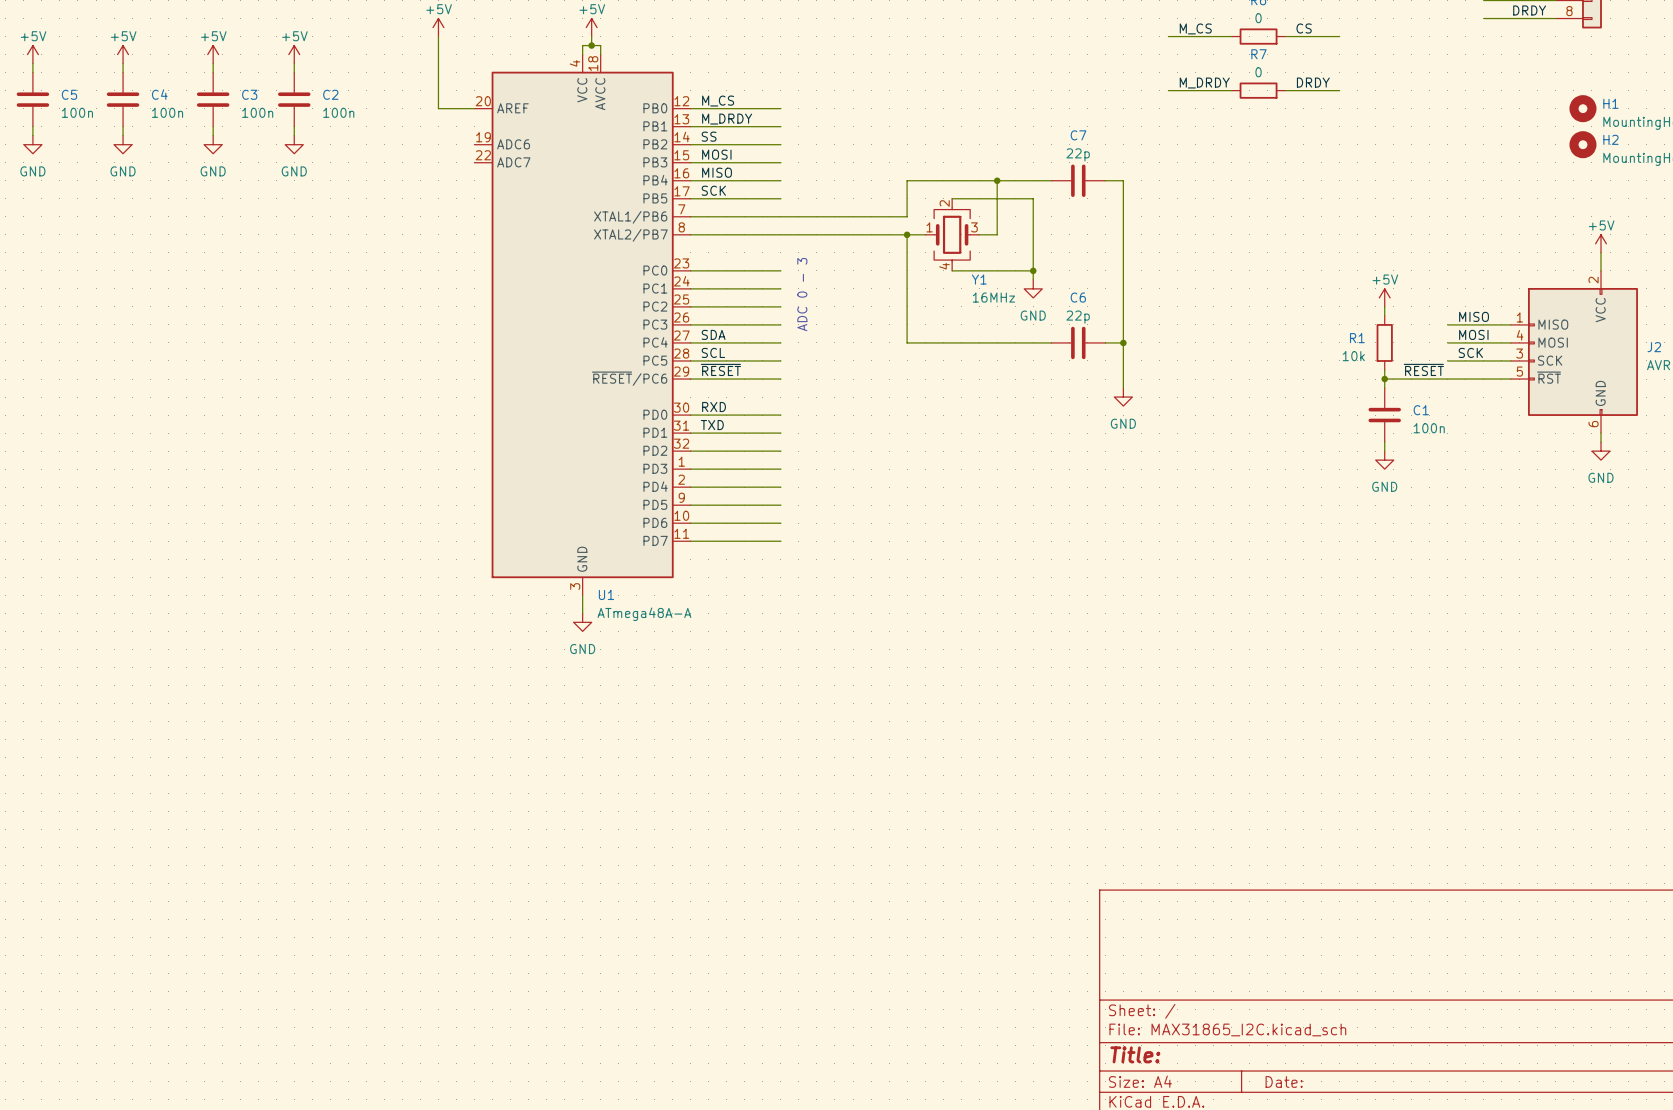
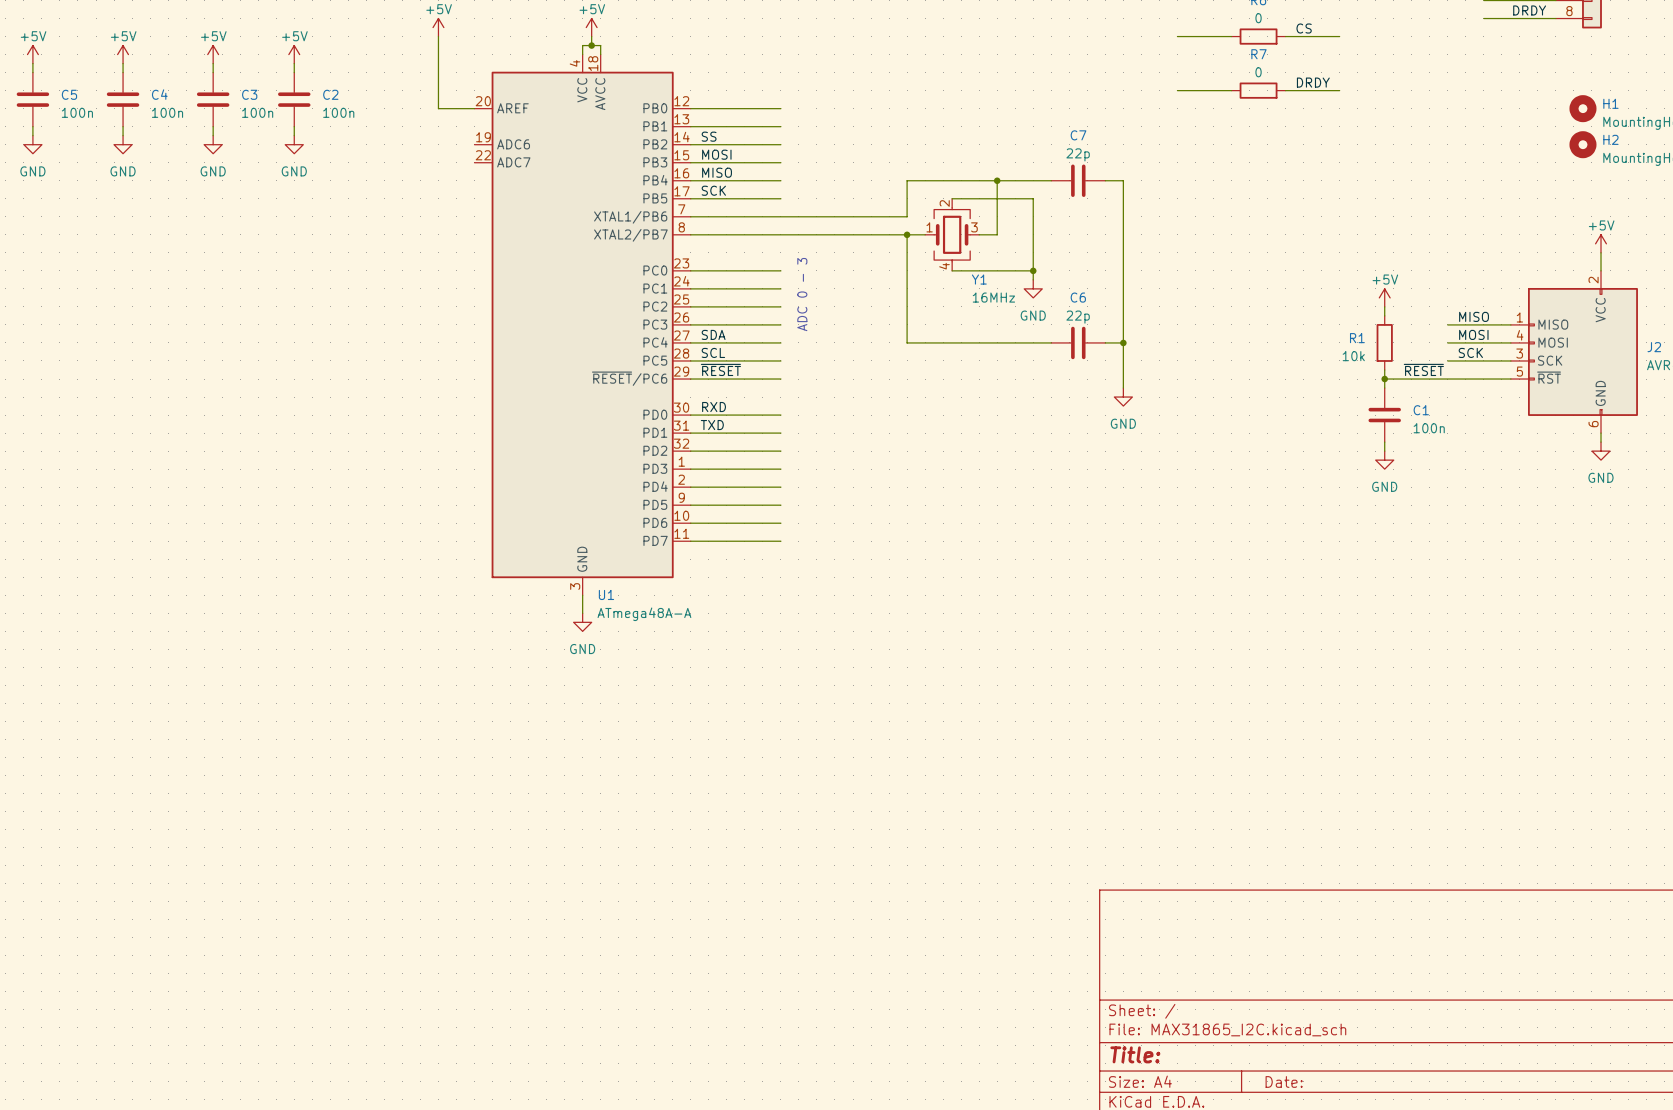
label: M_CS (1195, 28) -> none
wire: (1168, 36) (1177, 36) -> none
label: M_DRDY (1204, 83) -> none
wire: (1168, 90) (1177, 90) -> none
label: M_CS (718, 101) -> none
label: M_DRDY (727, 119) -> none

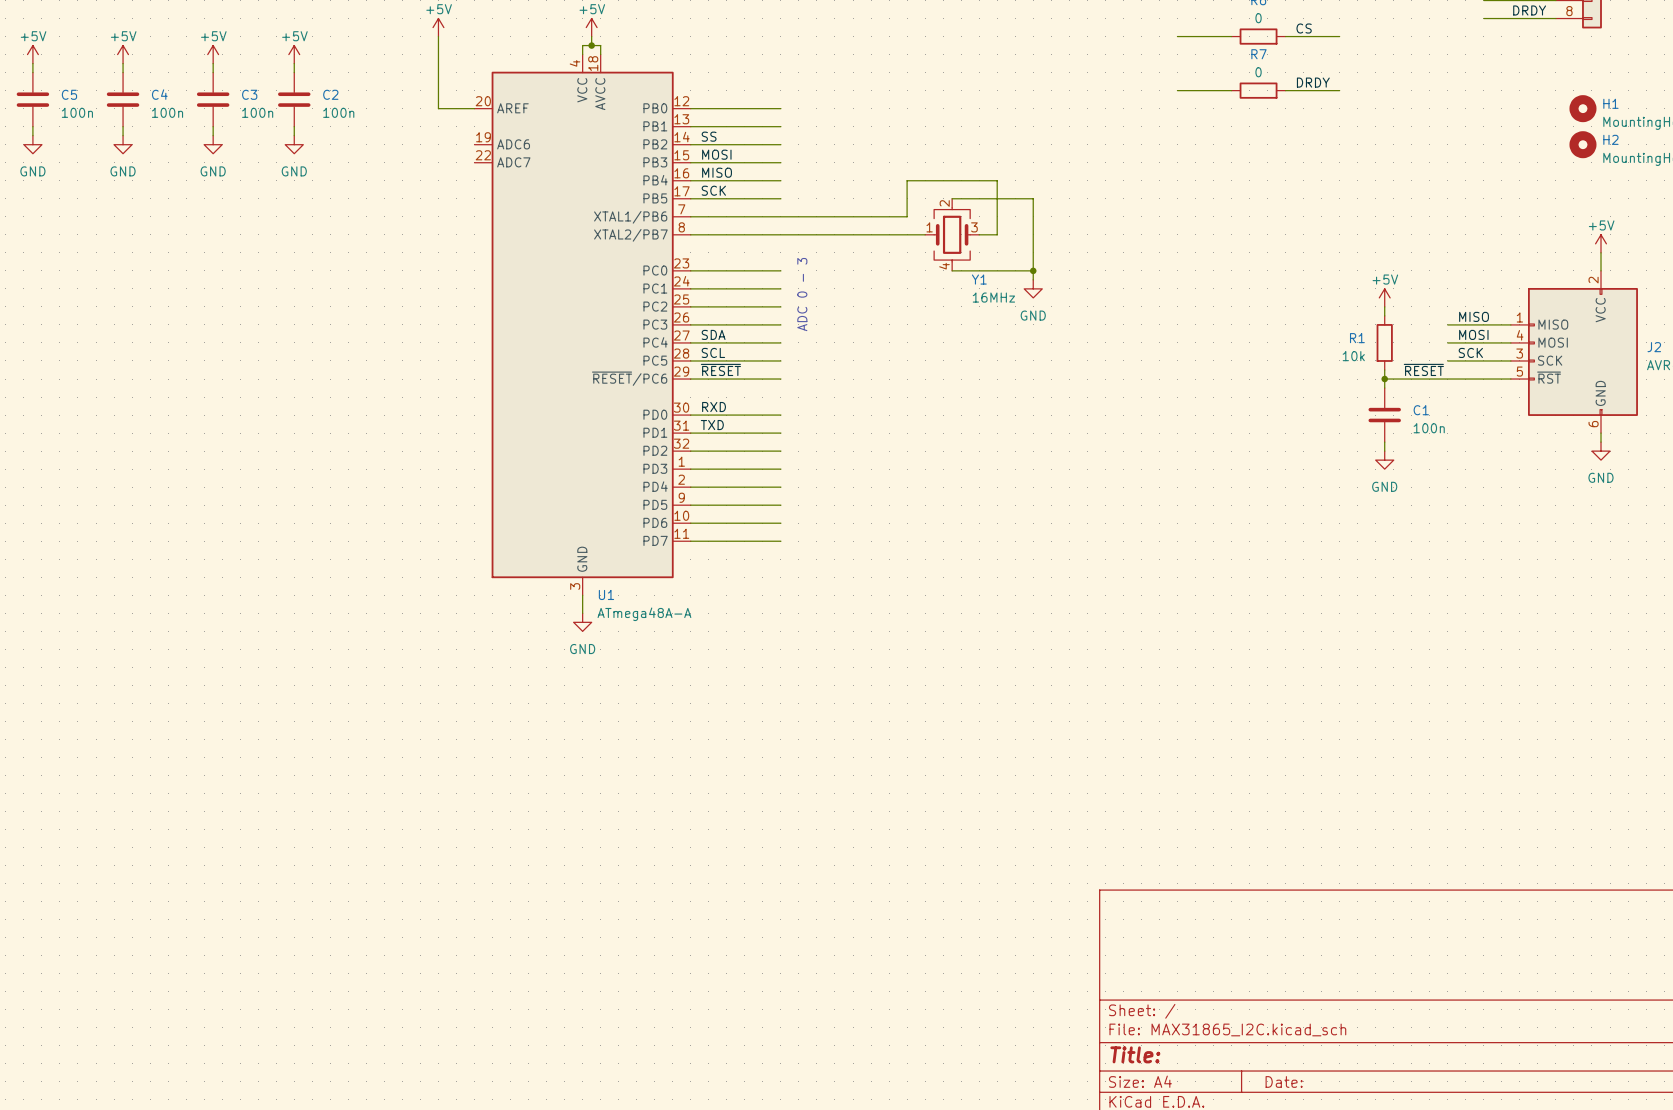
wire: (997, 180) (1051, 180) -> none
junction: (997, 180) -> none
C7: 22p (1078, 180) -> none
wire: (1105, 180) (1123, 180) (1123, 388) -> none
wire: (907, 234) (907, 342) (1051, 342) -> none
junction: (907, 234) -> none
C6: 22p (1078, 342) -> none
wire: (1105, 342) (1123, 342) -> none
junction: (1123, 342) -> none
power symbol: GND (1123, 397) -> none

